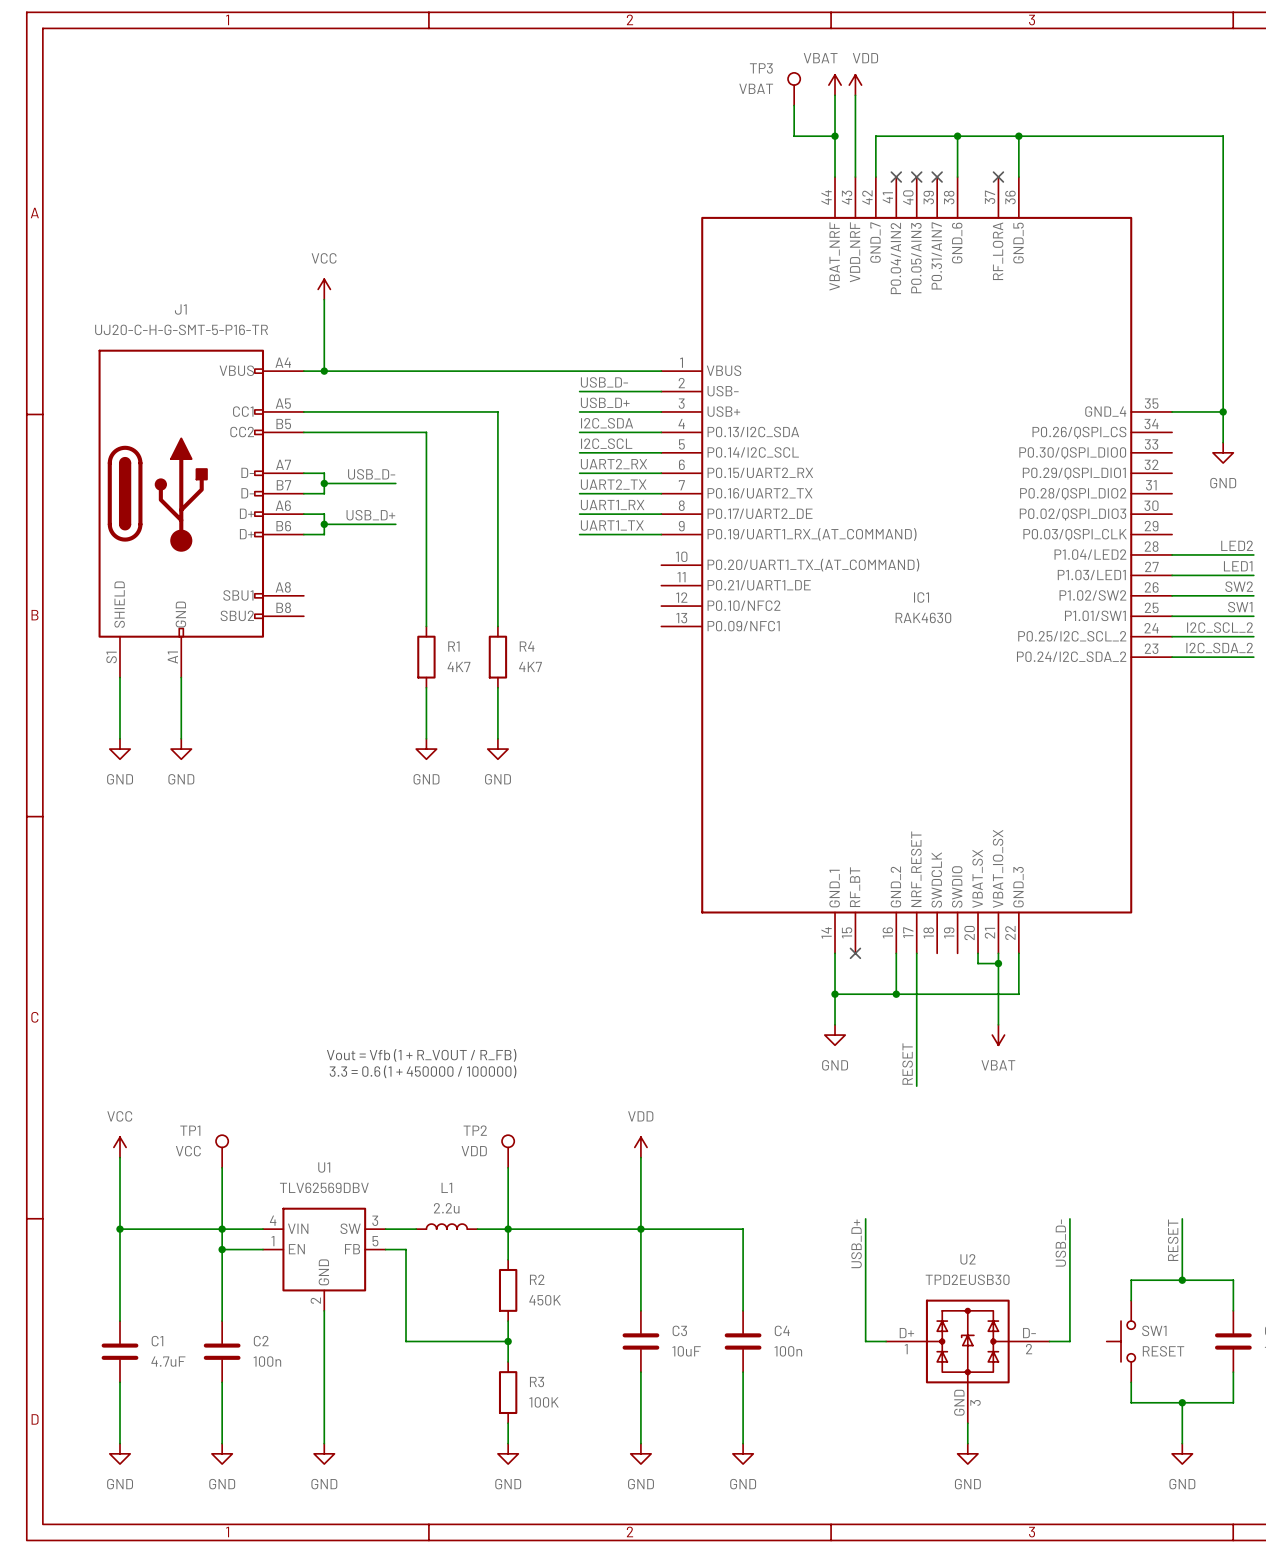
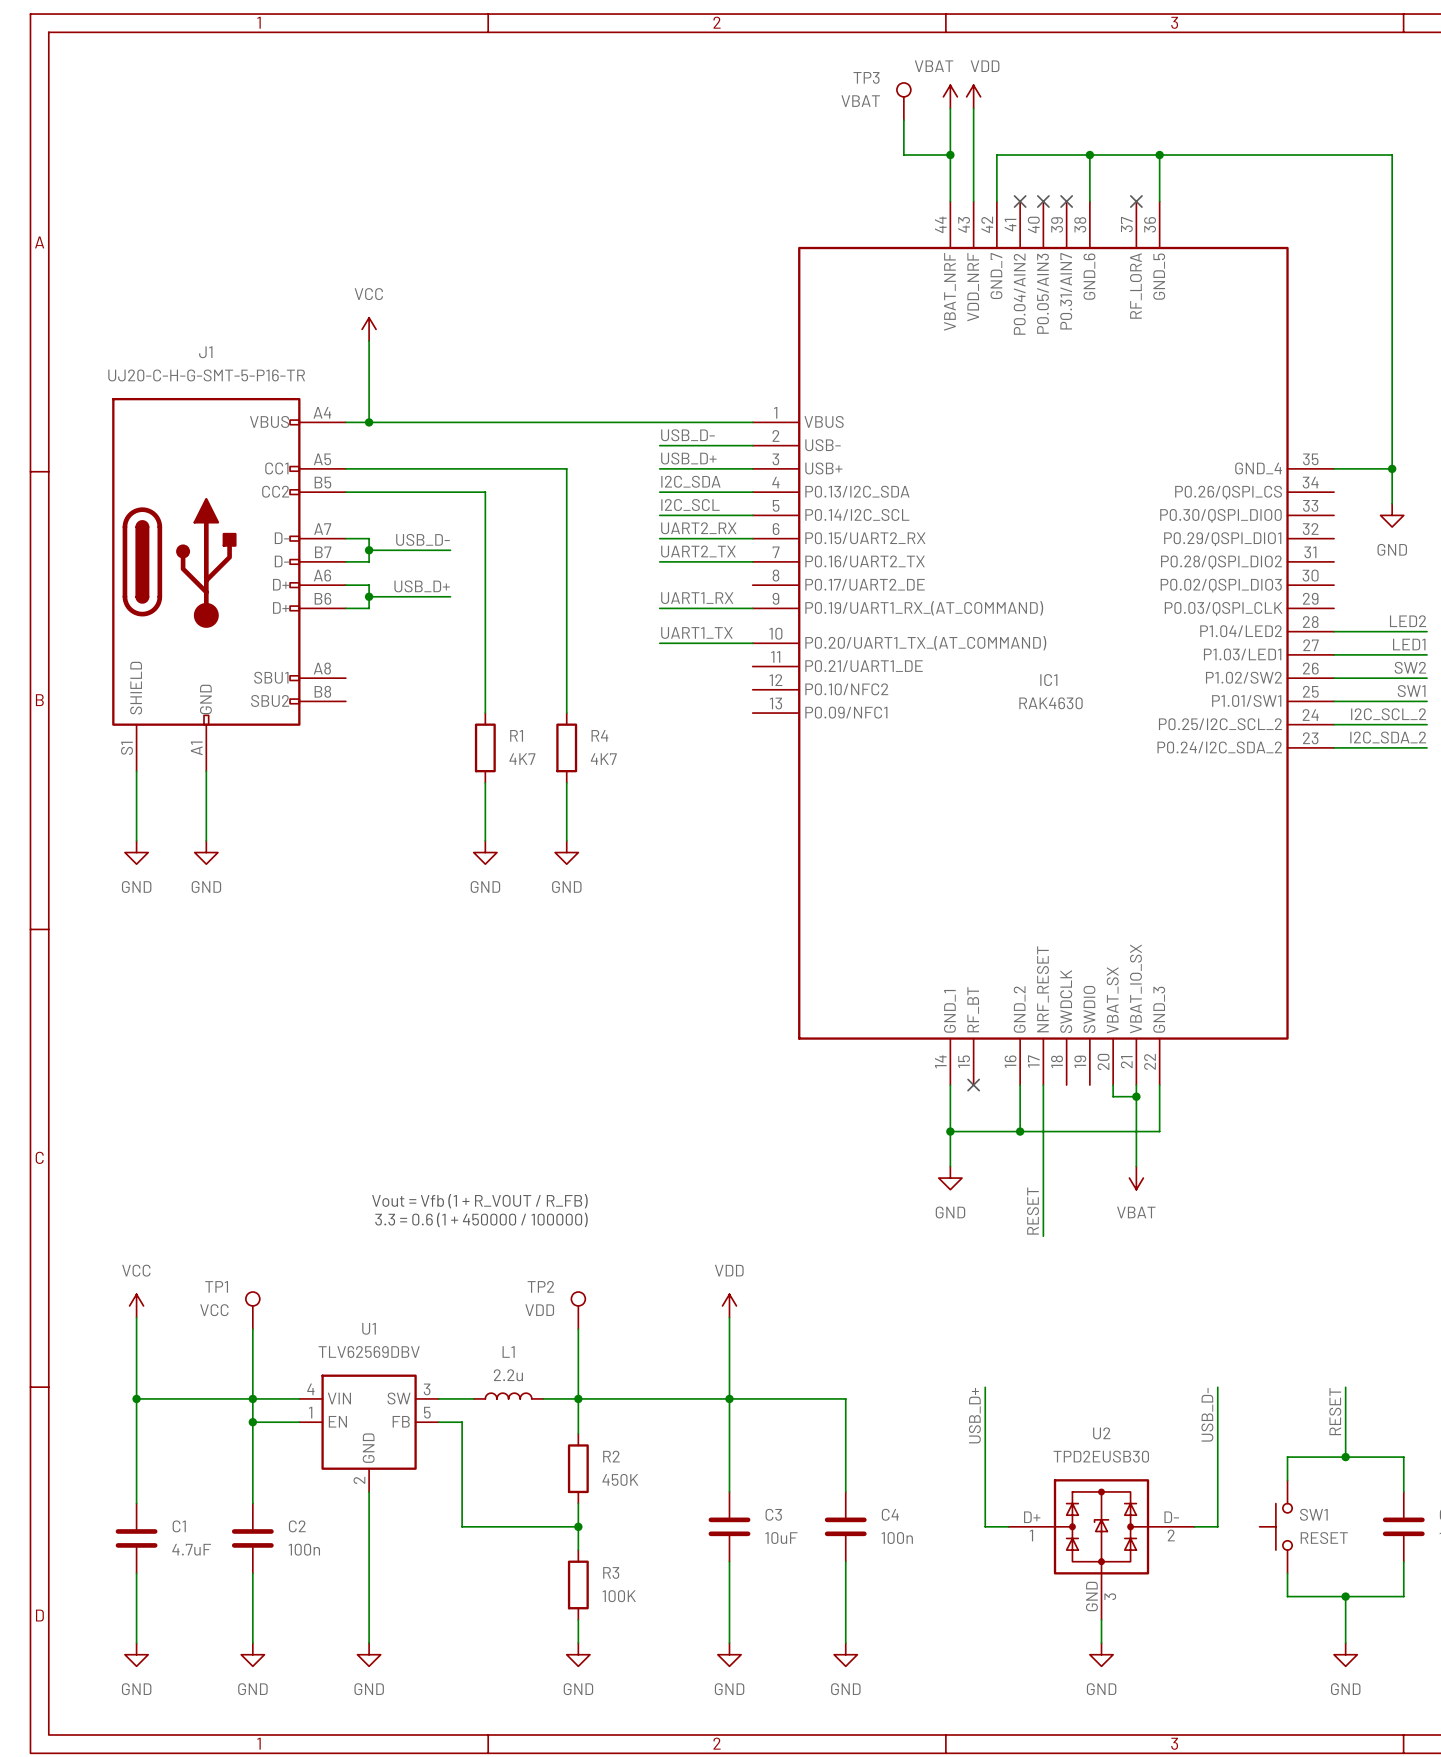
label: UART1_RX (612, 505) -> none
wire: (579, 514) (661, 514) -> (659, 643) (752, 643)
label: UART1_TX (612, 525) -> UART1_RX (697, 598)
label: none -> UART1_TX (696, 632)

